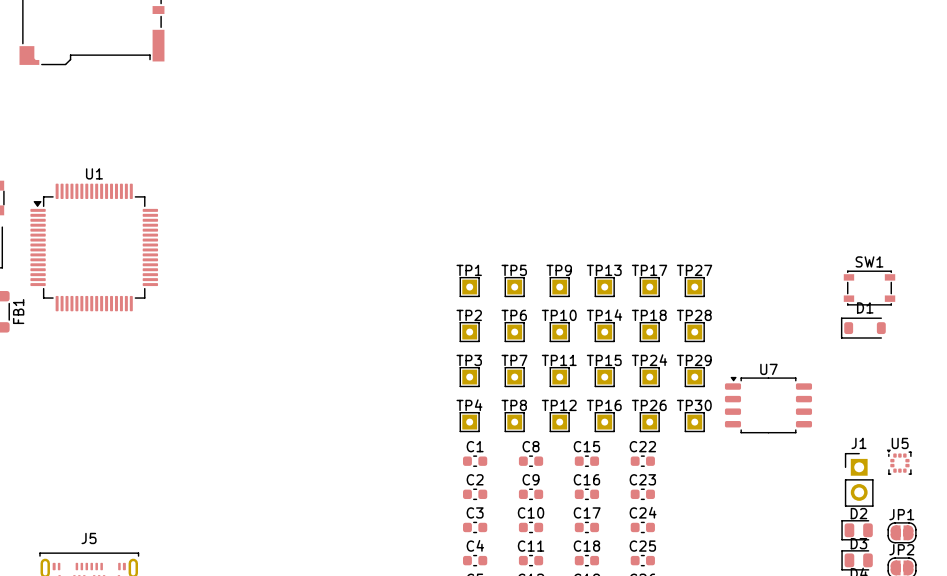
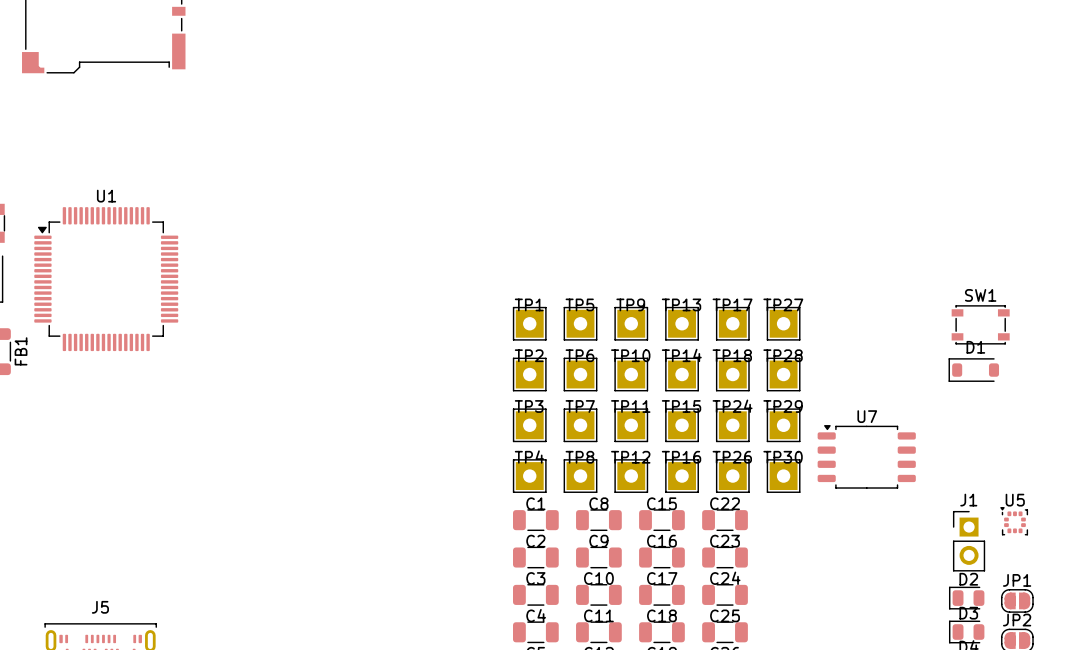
TP1 footprint: [459, 277, 480, 298] -> [512, 306, 547, 341]
TP5 footprint: [504, 277, 525, 298] -> [563, 306, 598, 341]
TP9 footprint: [549, 277, 570, 298] -> [614, 306, 649, 341]
TP13 footprint: [594, 277, 615, 298] -> [665, 306, 699, 341]
TP17 footprint: [639, 277, 660, 298] -> [715, 306, 750, 341]
TP27 footprint: [684, 277, 705, 298] -> [766, 306, 801, 341]
TP2 footprint: [459, 322, 480, 343] -> [512, 357, 547, 392]
TP6 footprint: [504, 322, 525, 343] -> [563, 357, 598, 392]
TP10 footprint: [549, 322, 570, 343] -> [614, 357, 649, 392]
TP14 footprint: [594, 322, 615, 343] -> [665, 357, 699, 392]
TP18 footprint: [639, 322, 660, 343] -> [715, 357, 750, 392]
TP28 footprint: [684, 322, 705, 343] -> [766, 357, 801, 392]
TP3 footprint: [459, 367, 480, 388] -> [512, 408, 547, 443]
TP7 footprint: [504, 367, 525, 388] -> [563, 408, 598, 443]
TP11 footprint: [549, 367, 570, 388] -> [614, 408, 649, 443]
TP15 footprint: [594, 367, 615, 388] -> [665, 408, 699, 443]
TP24 footprint: [639, 367, 660, 388] -> [715, 408, 750, 443]
TP29 footprint: [684, 367, 705, 388] -> [766, 408, 801, 443]
TP4 footprint: [459, 412, 480, 433] -> [512, 459, 547, 493]
TP8 footprint: [504, 412, 525, 433] -> [563, 459, 598, 493]
TP12 footprint: [549, 412, 570, 433] -> [614, 459, 649, 493]
TP16 footprint: [594, 412, 615, 433] -> [665, 459, 699, 493]
TP26 footprint: [639, 412, 660, 433] -> [715, 459, 750, 493]
TP30 footprint: [684, 412, 705, 433] -> [766, 459, 801, 493]
C1 footprint: [463, 455, 488, 467] -> [512, 509, 559, 531]
C8 footprint: [518, 455, 544, 467] -> [576, 509, 622, 531]
C15 footprint: [574, 455, 600, 467] -> [639, 509, 685, 531]
C22 footprint: [630, 455, 655, 467] -> [702, 509, 748, 531]
C2 footprint: [463, 488, 488, 500] -> [512, 546, 559, 569]
C9 footprint: [518, 488, 544, 500] -> [576, 546, 622, 569]
C16 footprint: [574, 488, 600, 500] -> [639, 546, 685, 569]
C23 footprint: [630, 488, 655, 500] -> [702, 546, 748, 569]
C3 footprint: [463, 521, 488, 534] -> [512, 584, 559, 606]
C10 footprint: [518, 521, 544, 534] -> [576, 584, 622, 606]
C17 footprint: [574, 521, 600, 534] -> [639, 584, 685, 606]
C24 footprint: [630, 521, 655, 534] -> [702, 584, 748, 606]
C4 footprint: [463, 554, 488, 567] -> [512, 621, 559, 644]
C11 footprint: [518, 554, 544, 567] -> [576, 621, 622, 644]
C18 footprint: [574, 554, 600, 567] -> [639, 621, 685, 644]
C25 footprint: [630, 554, 655, 567] -> [702, 621, 748, 644]

